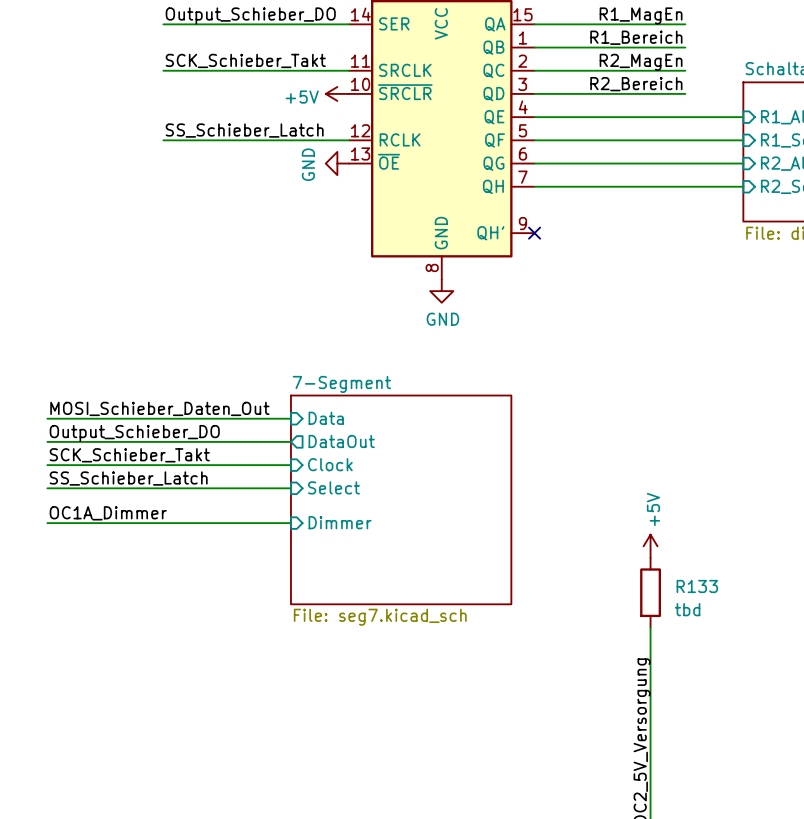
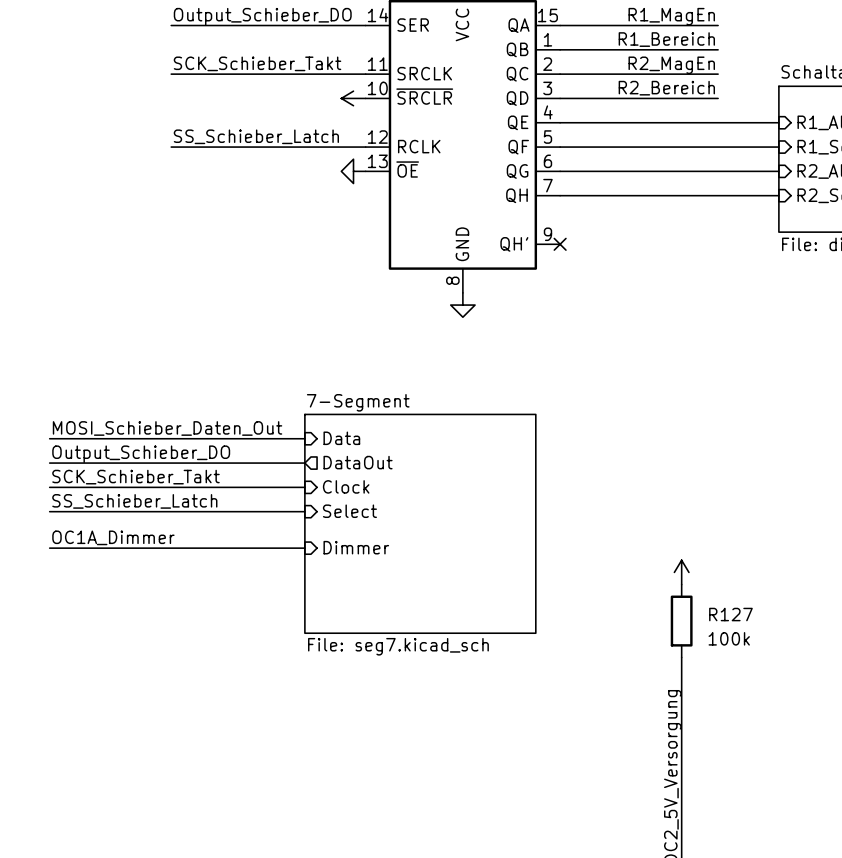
power symbol text: +5V (302, 97) -> none
power symbol text: GND (308, 164) -> none
power symbol text: GND (442, 319) -> none
power symbol text: +5V (653, 509) -> none
R133 name: R133 (697, 586) -> R127 (730, 614)
R133 value: tbd (687, 609) -> 100k (729, 638)

